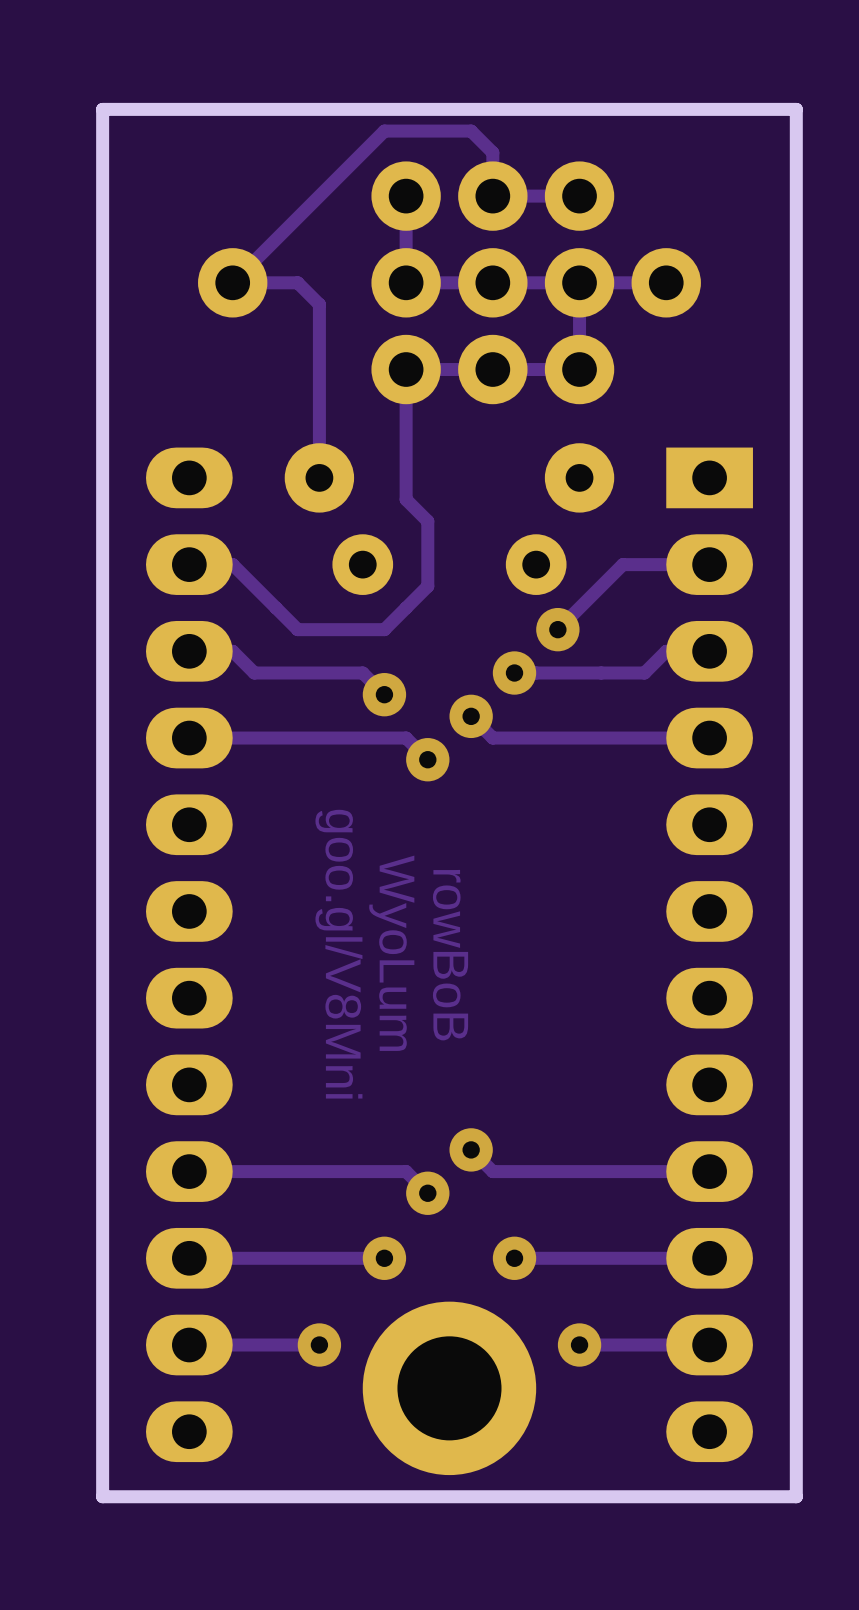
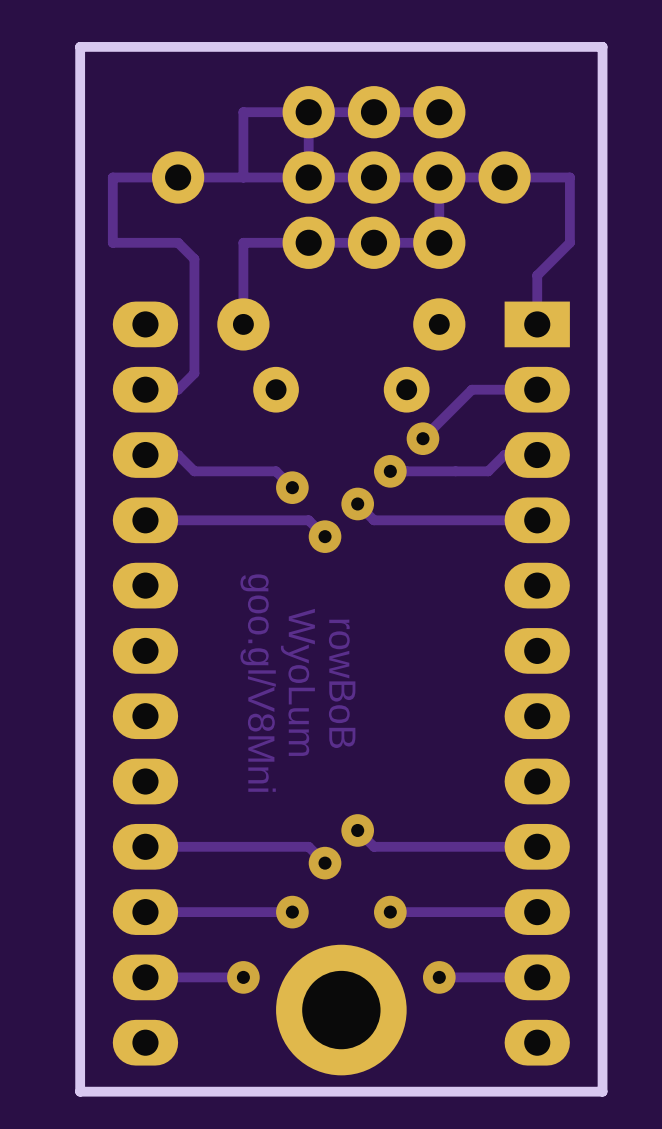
track: (492, 196) (492, 152) (471, 131) (384, 131) (232, 282) -> (374, 112) (243, 112) (243, 177)
track: (297, 282) (319, 304) (319, 369) -> (227, 177) (308, 177)
track: none -> (504, 177) (569, 177) (569, 242) (537, 275) (537, 324)
track: (406, 369) (406, 499) (427, 521) (427, 586) (384, 629) (297, 629) (232, 564) -> (178, 177) (112, 177) (112, 242) (178, 242) (194, 259) (194, 373) (178, 389)
track: none -> (308, 242) (243, 242)

